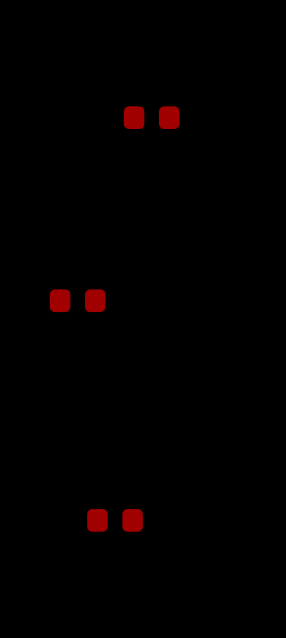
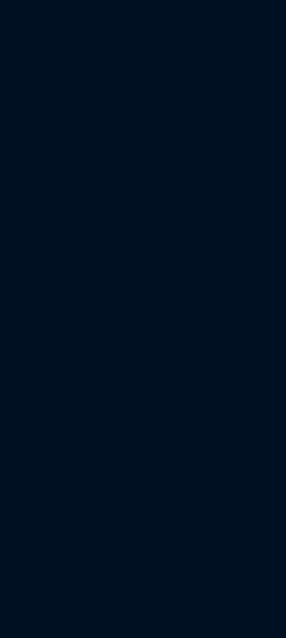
part: (151, 117) -> none
part: (77, 300) -> none
part: (115, 520) -> none

